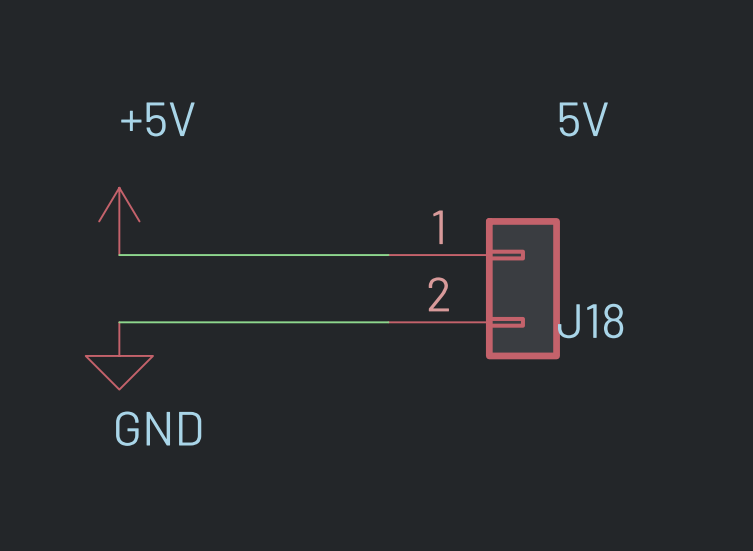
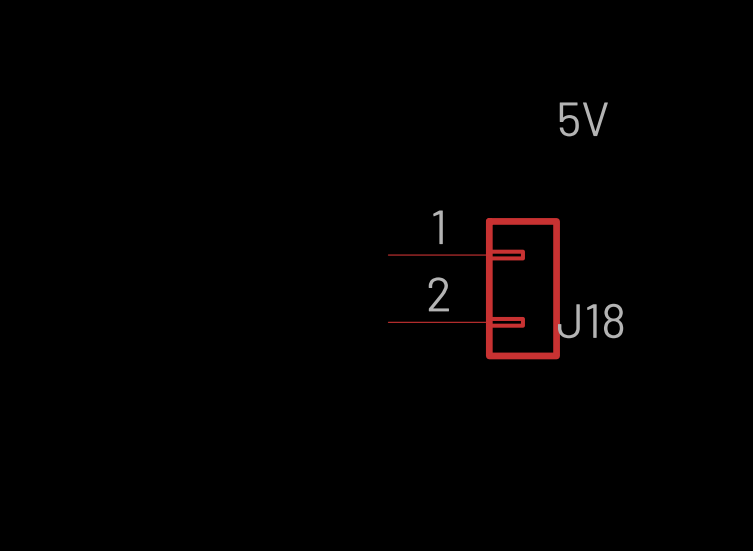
power symbol: +5V (119, 221) -> none
wire: (119, 255) (388, 255) -> none
wire: (119, 322) (388, 322) -> none
power symbol: GND (119, 355) -> none

